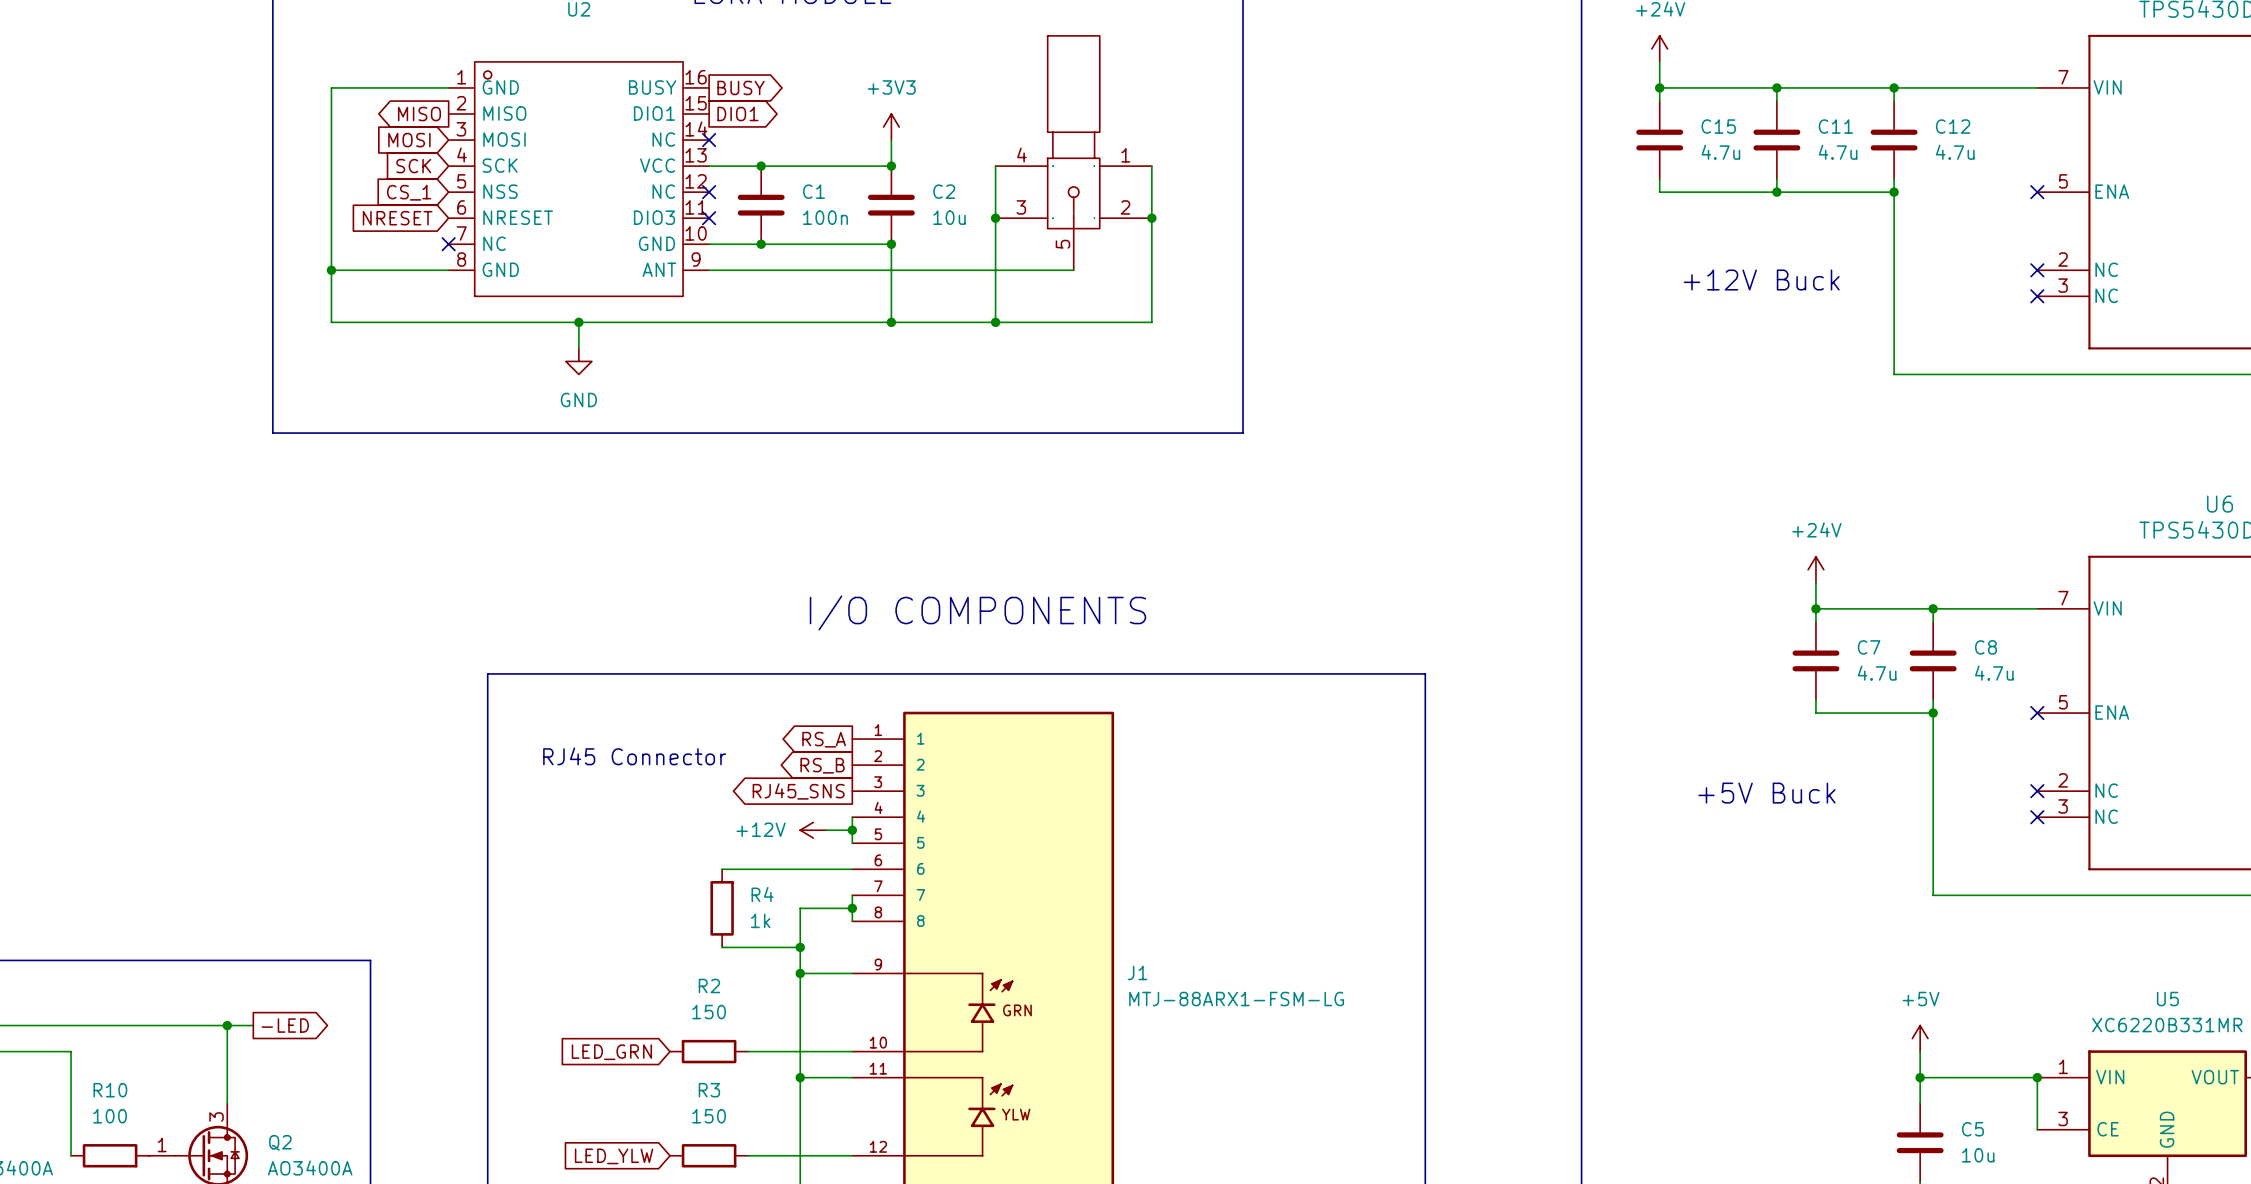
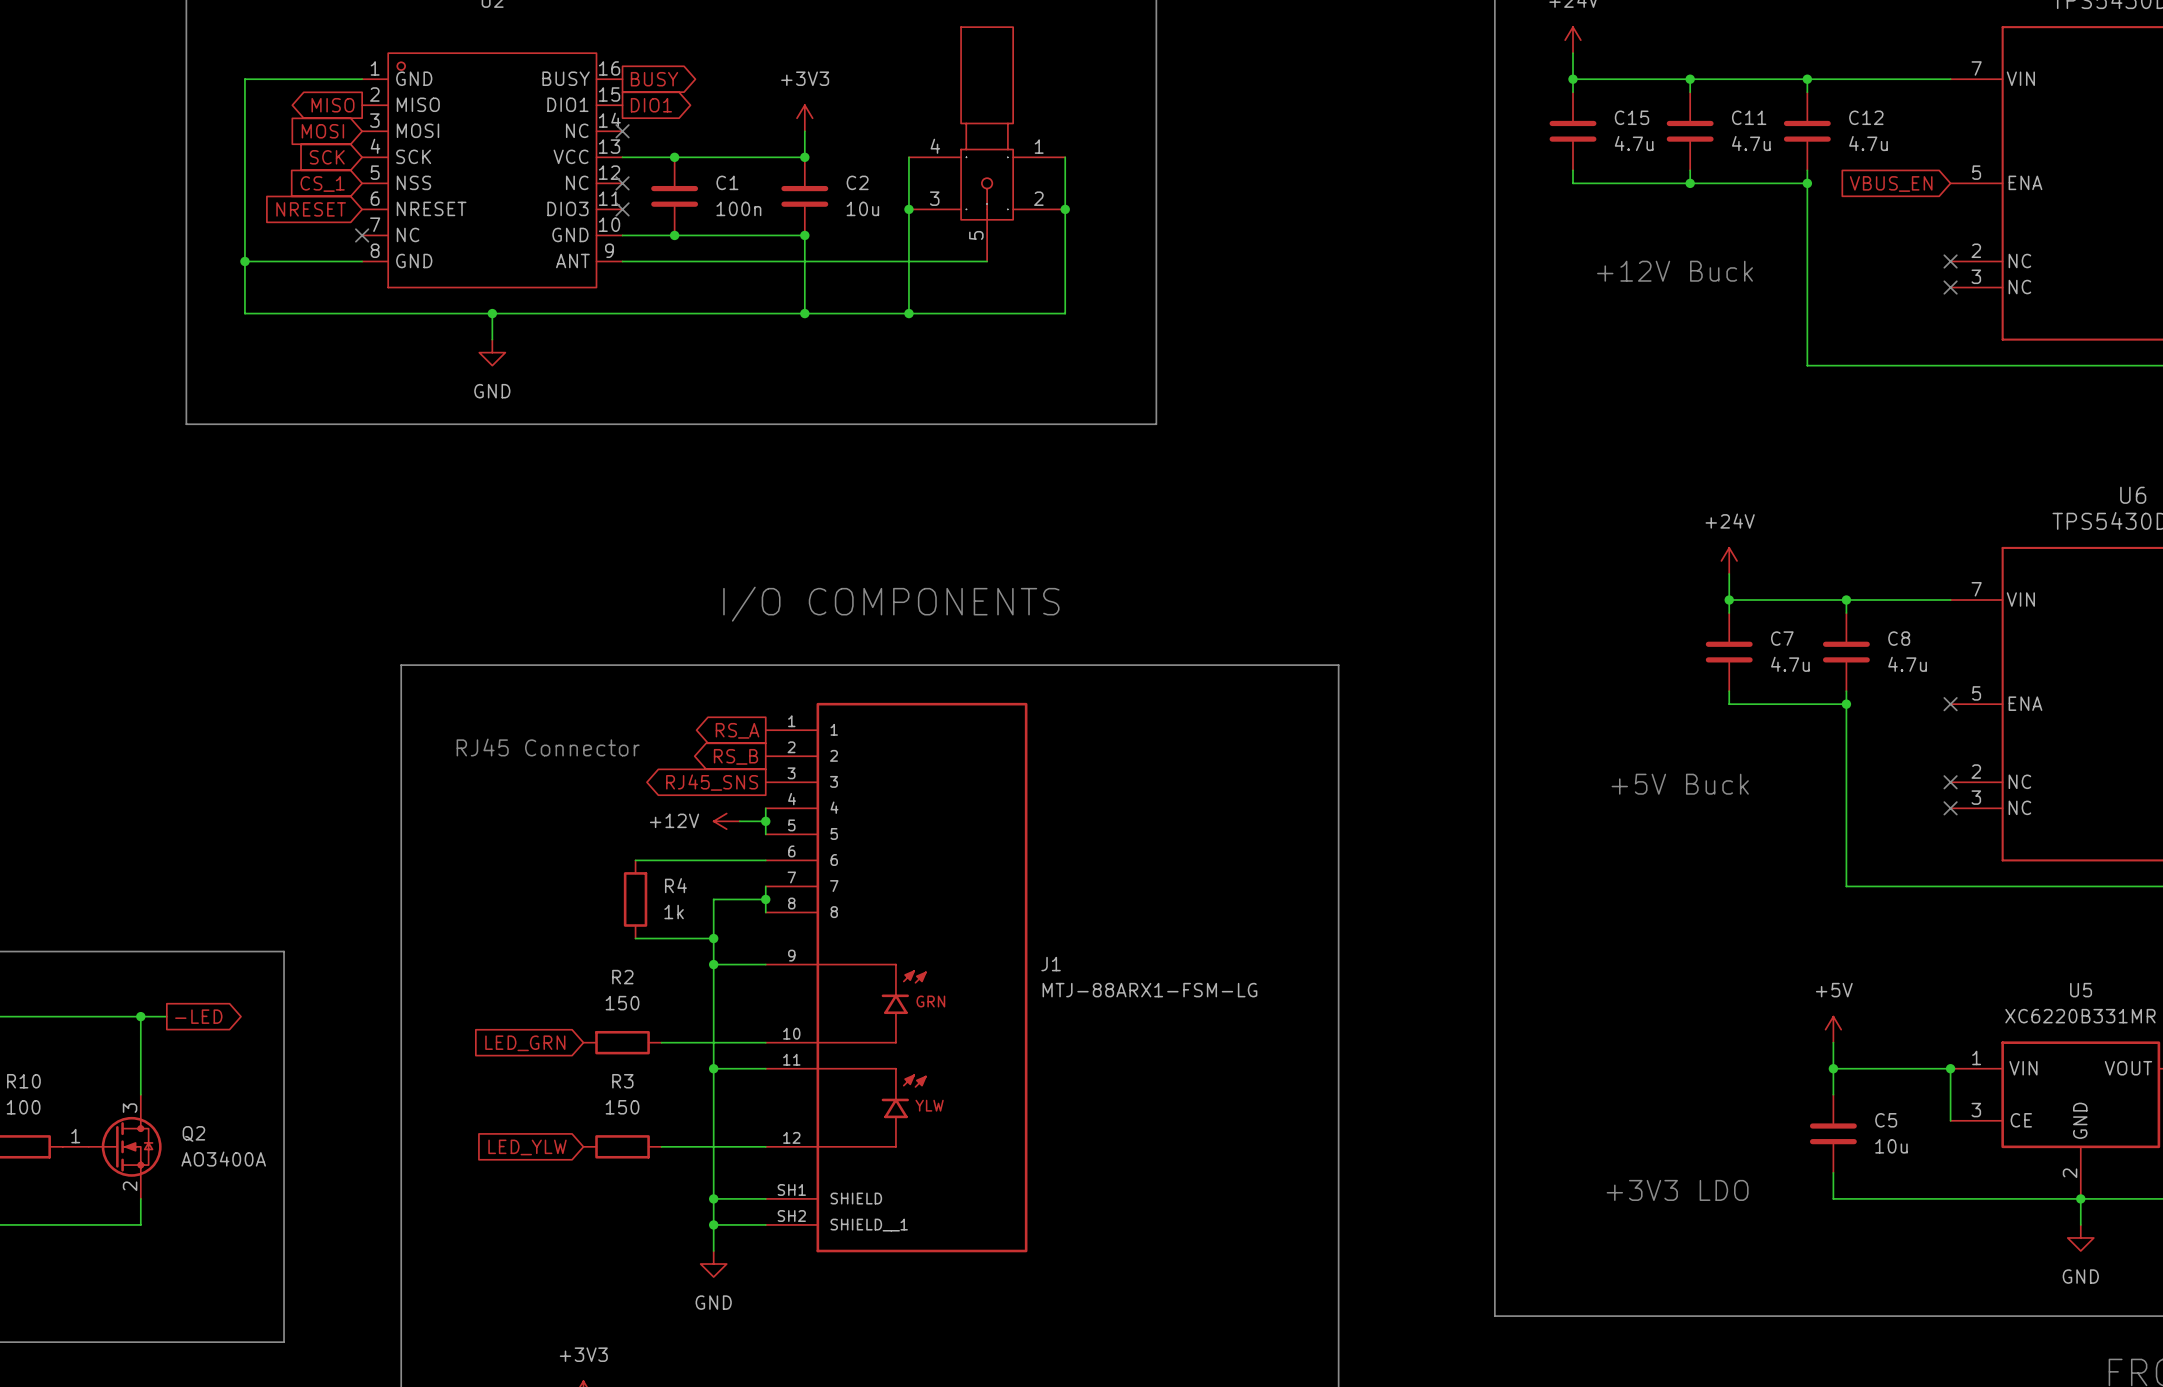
global label: none -> VBUS_EN (1891, 183)
no-connect mark: (2037, 192) -> none

